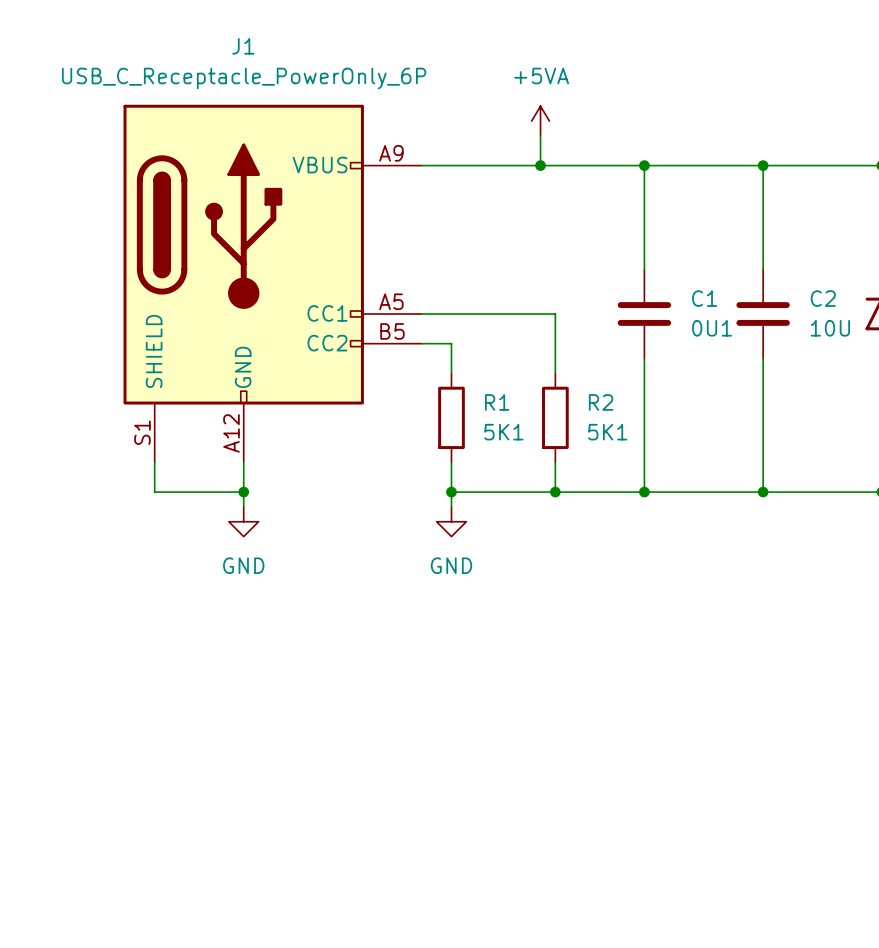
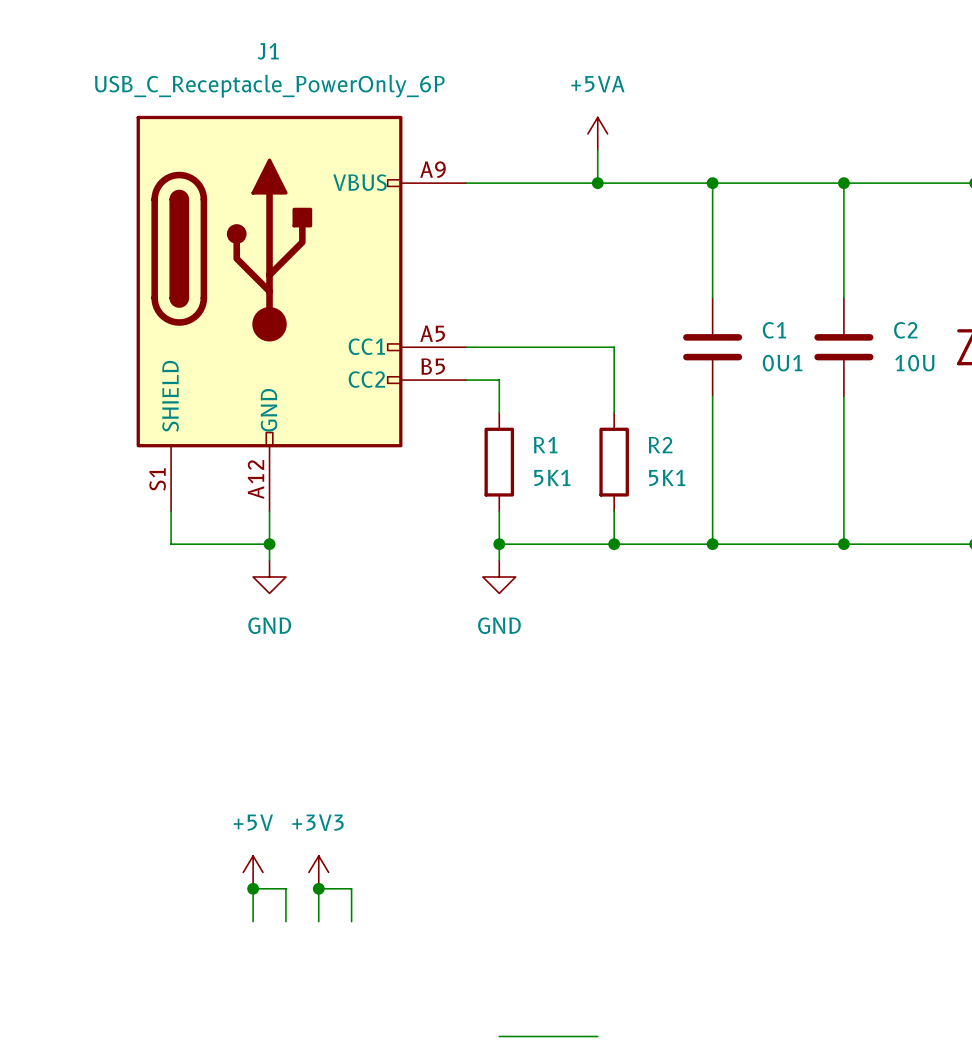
power symbol: none -> +5V (253, 872)
power symbol: none -> +3V3 (318, 872)
junction: none -> (253, 888)
junction: none -> (318, 888)
wire: none -> (253, 921) (253, 888) (285, 888) (285, 921)
wire: none -> (318, 921) (318, 888) (351, 888) (351, 921)
wire: none -> (499, 1036) (597, 1036)

